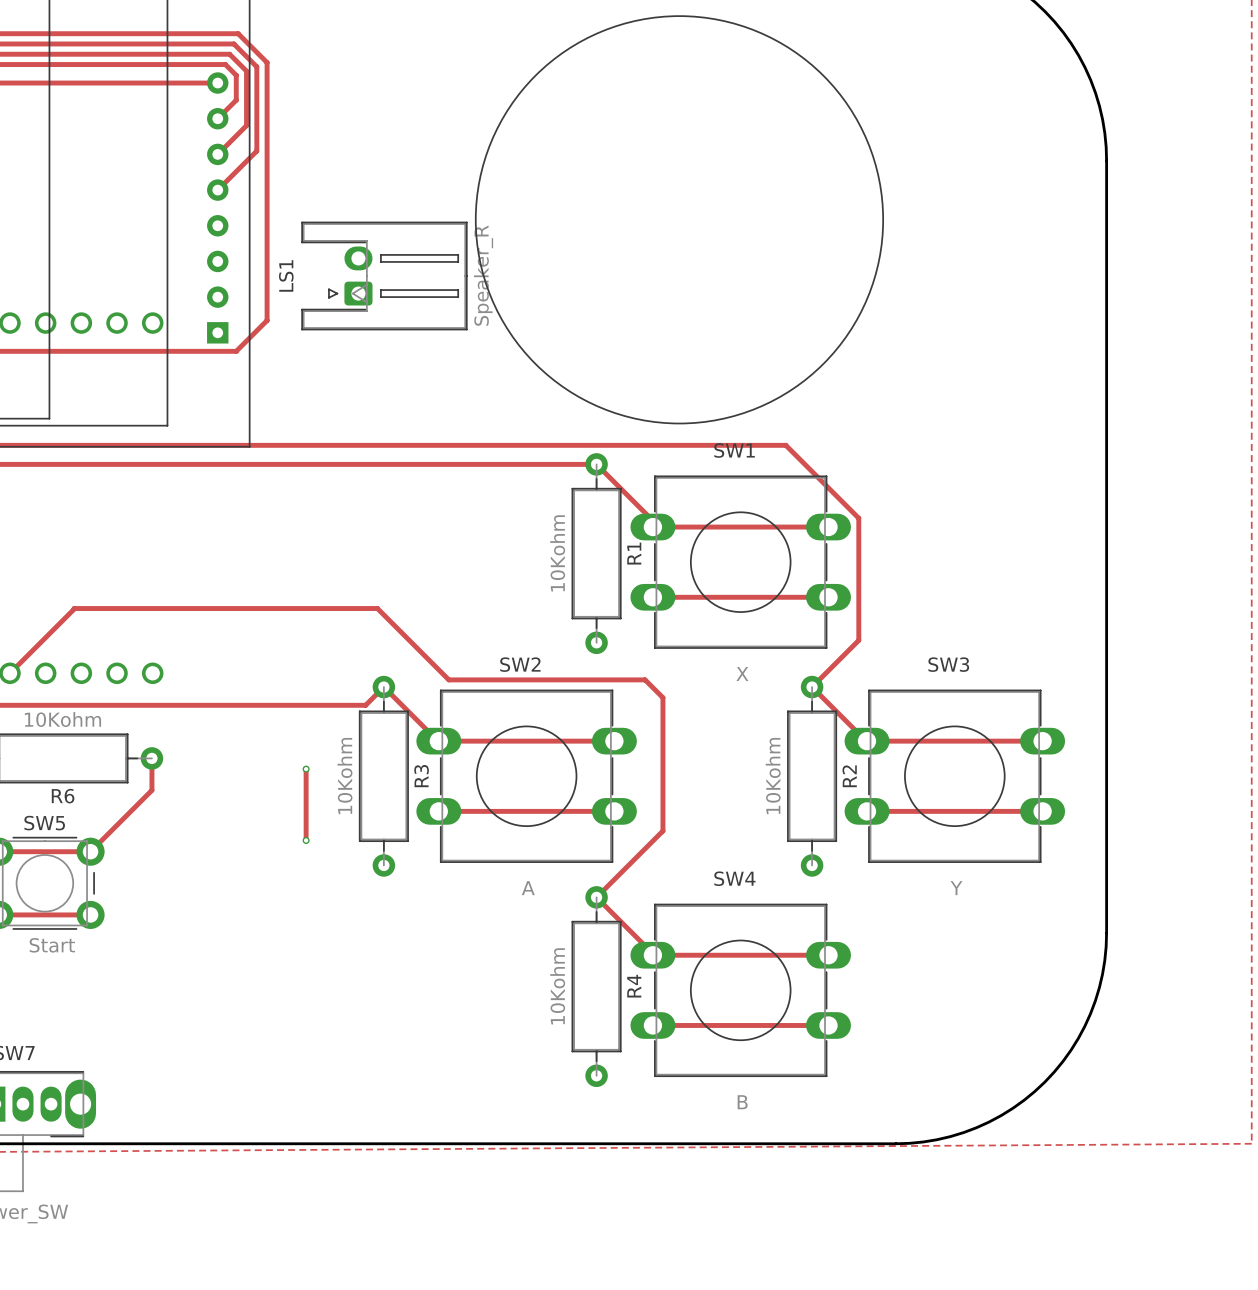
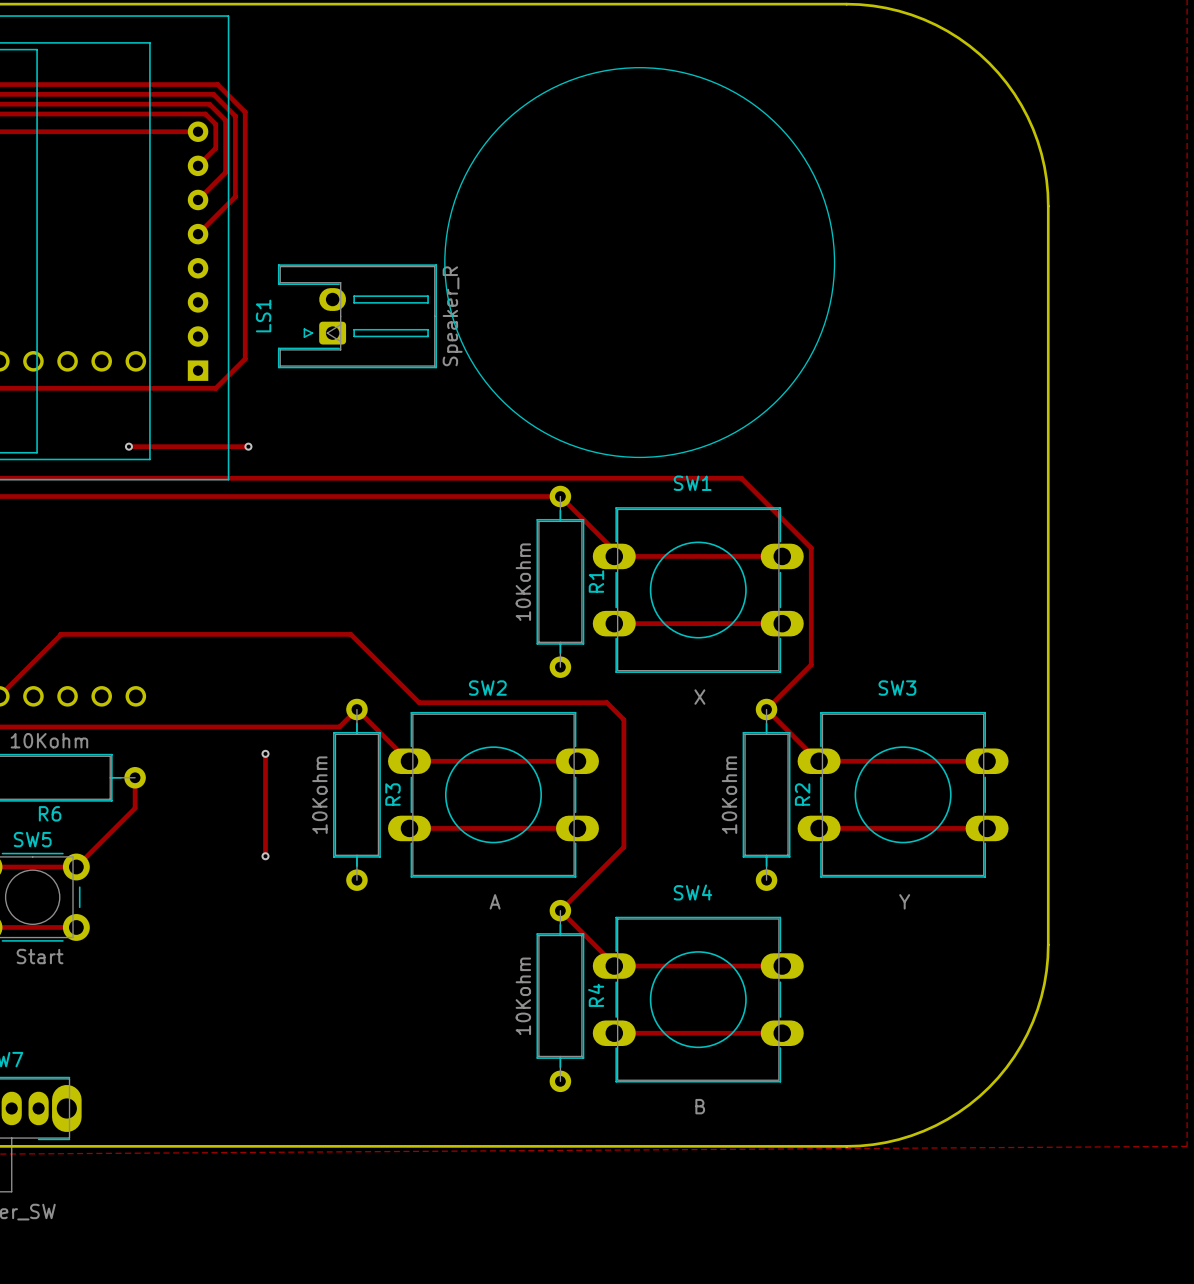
track: none -> (128, 446) (248, 446)
via: none -> (128, 446)
via: none -> (248, 446)
track: none -> (265, 753) (265, 856)
via: none -> (265, 753)
track: (306, 769) (306, 840) -> none
via: (306, 769) -> none
via: none -> (265, 856)
via: (306, 840) -> none

